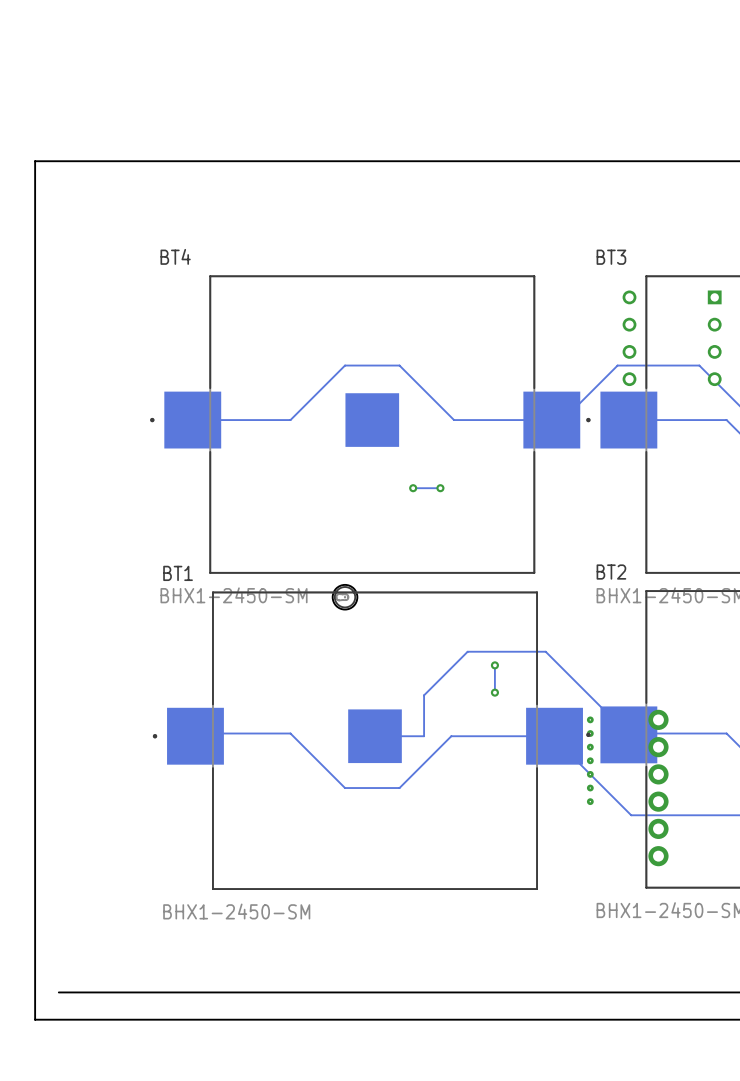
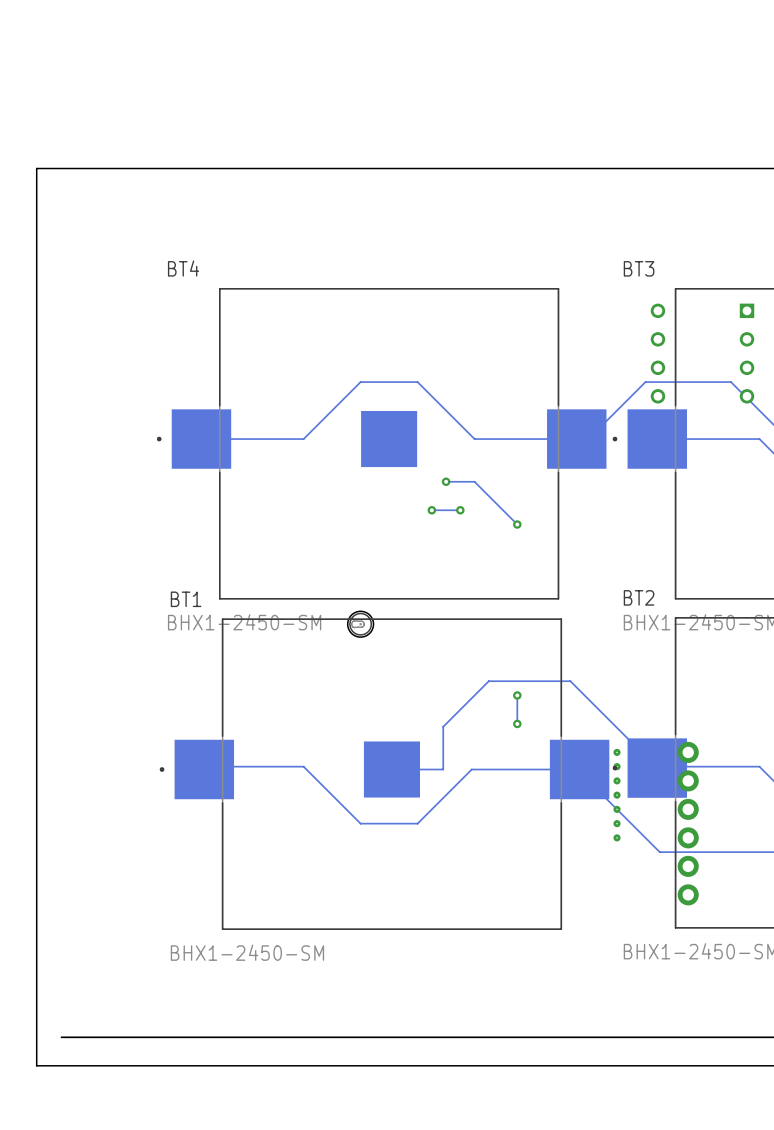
track: none -> (446, 481) (474, 481) (517, 524)
via: none -> (446, 481)
via: none -> (517, 524)

